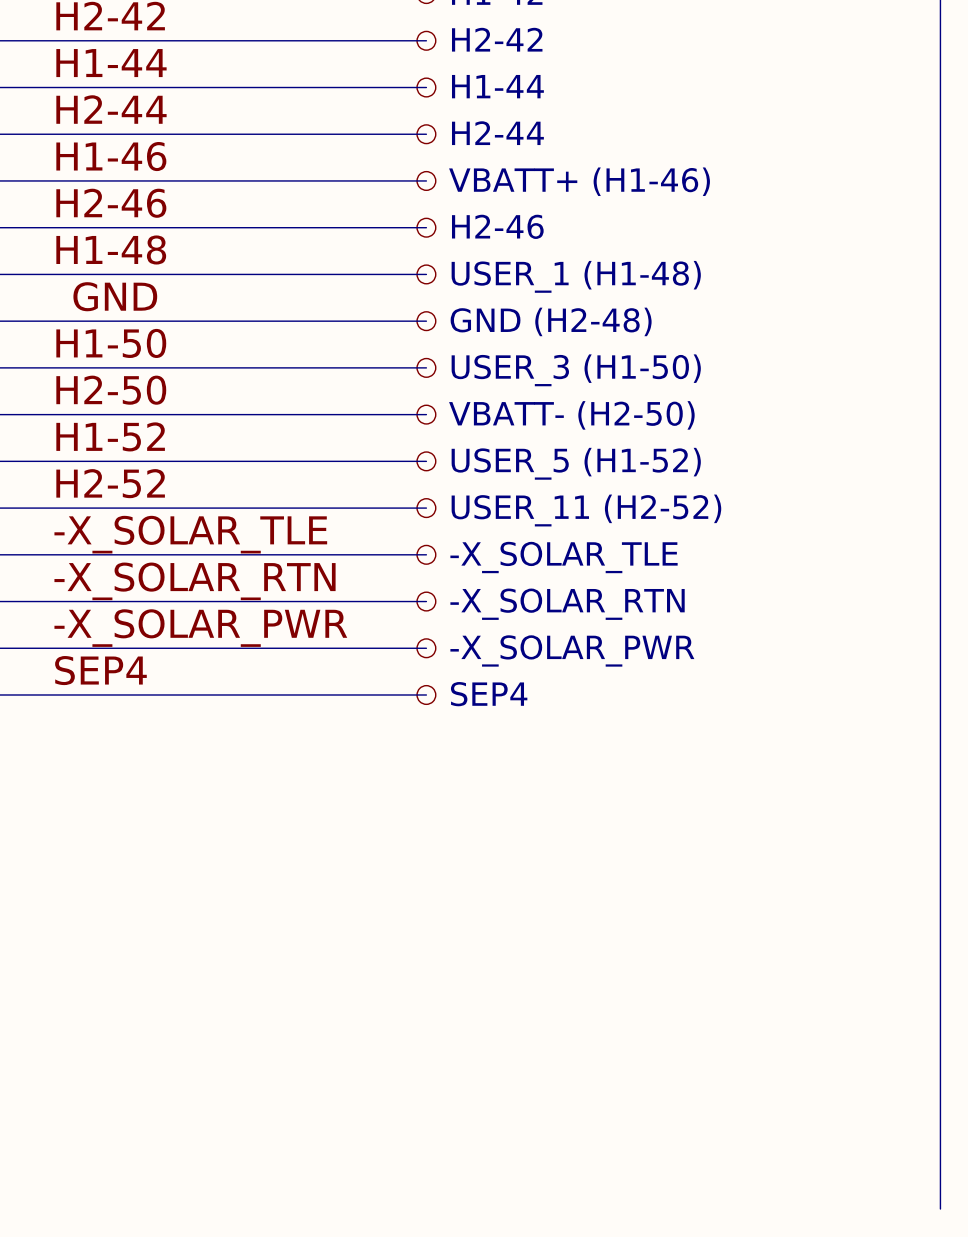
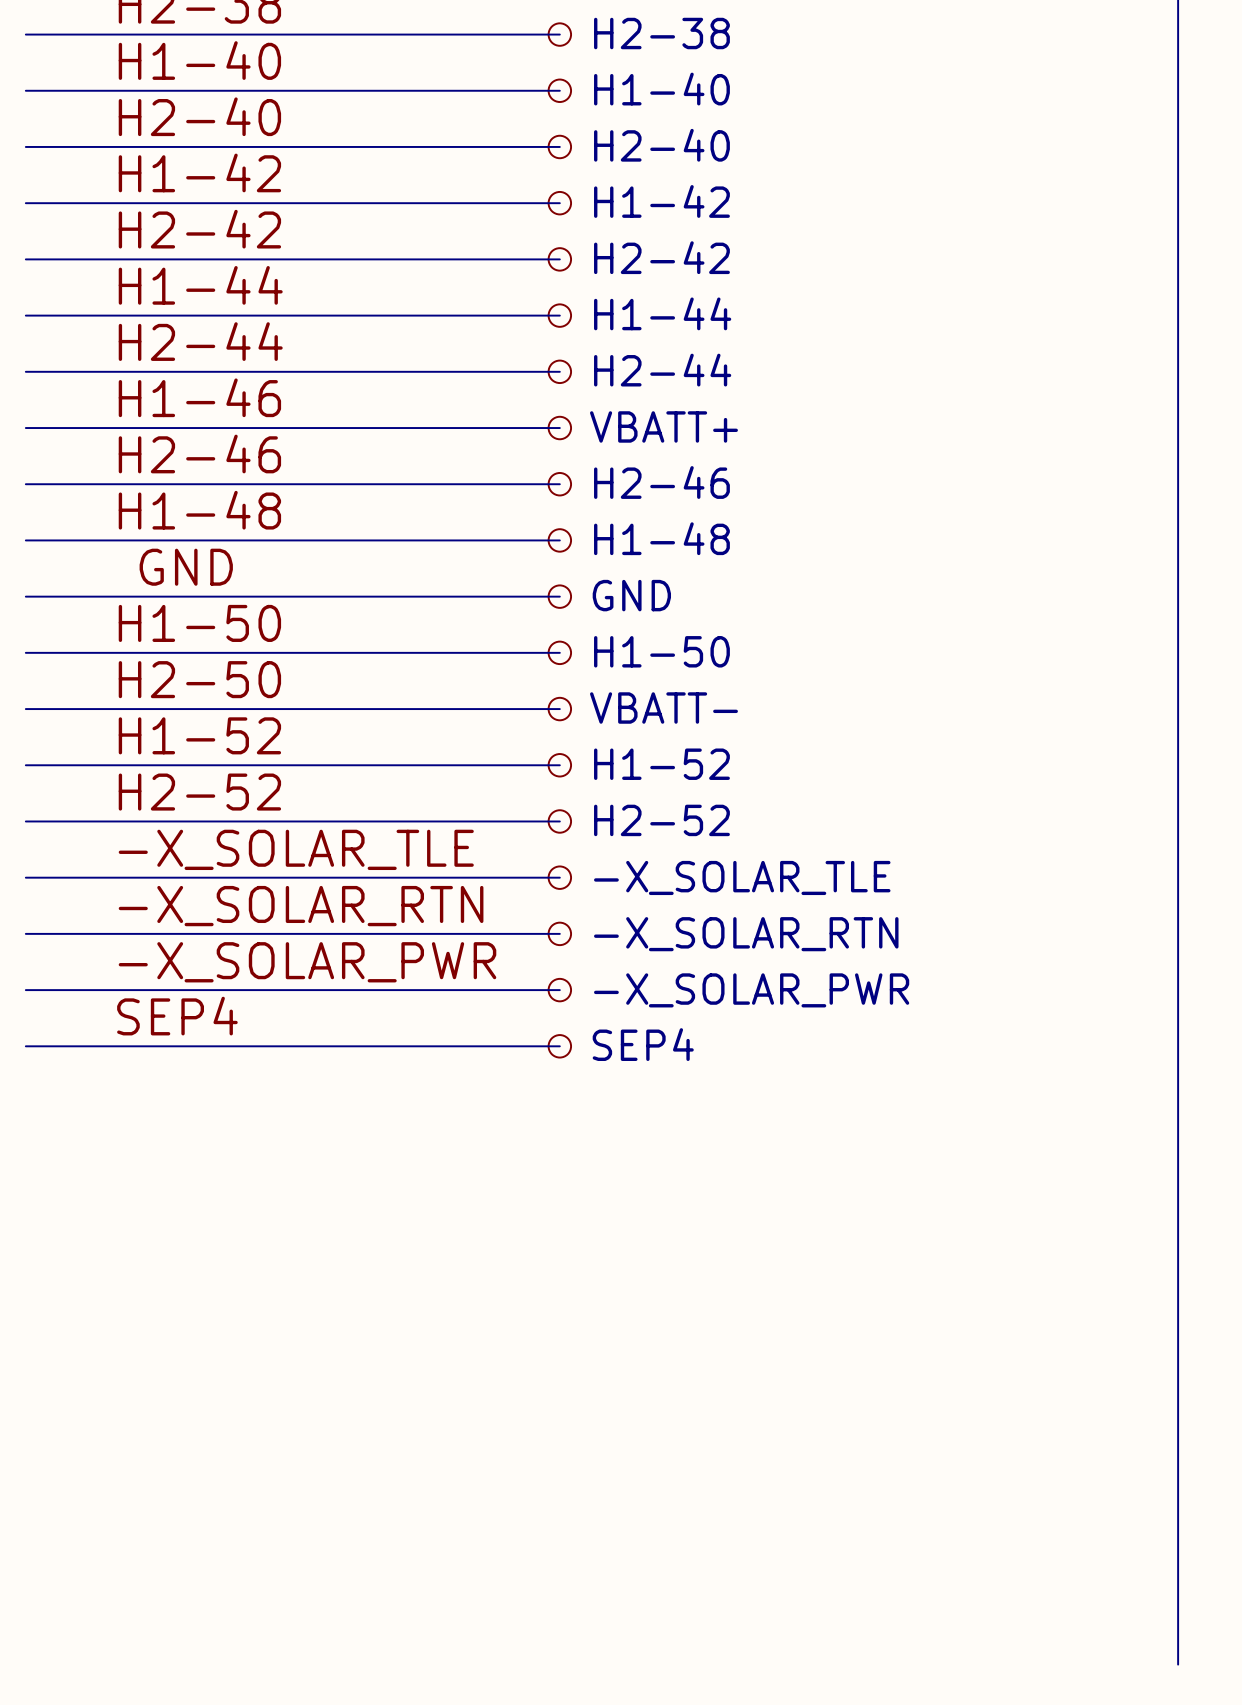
part value: VBATT+ (H1-46) (579, 181) -> VBATT+ (663, 426)
part value: USER_1 (H1-48) (576, 276) -> H1-48 (661, 538)
part value: GND (H2-48) (551, 321) -> GND (631, 595)
part value: USER_3 (H1-50) (576, 370) -> H1-50 (661, 651)
part value: VBATT- (H2-50) (571, 415) -> VBATT- (663, 708)
part value: USER_5 (H1-52) (576, 463) -> H1-52 (661, 764)
part value: USER_11 (H2-52) (586, 510) -> H2-52 (661, 820)

